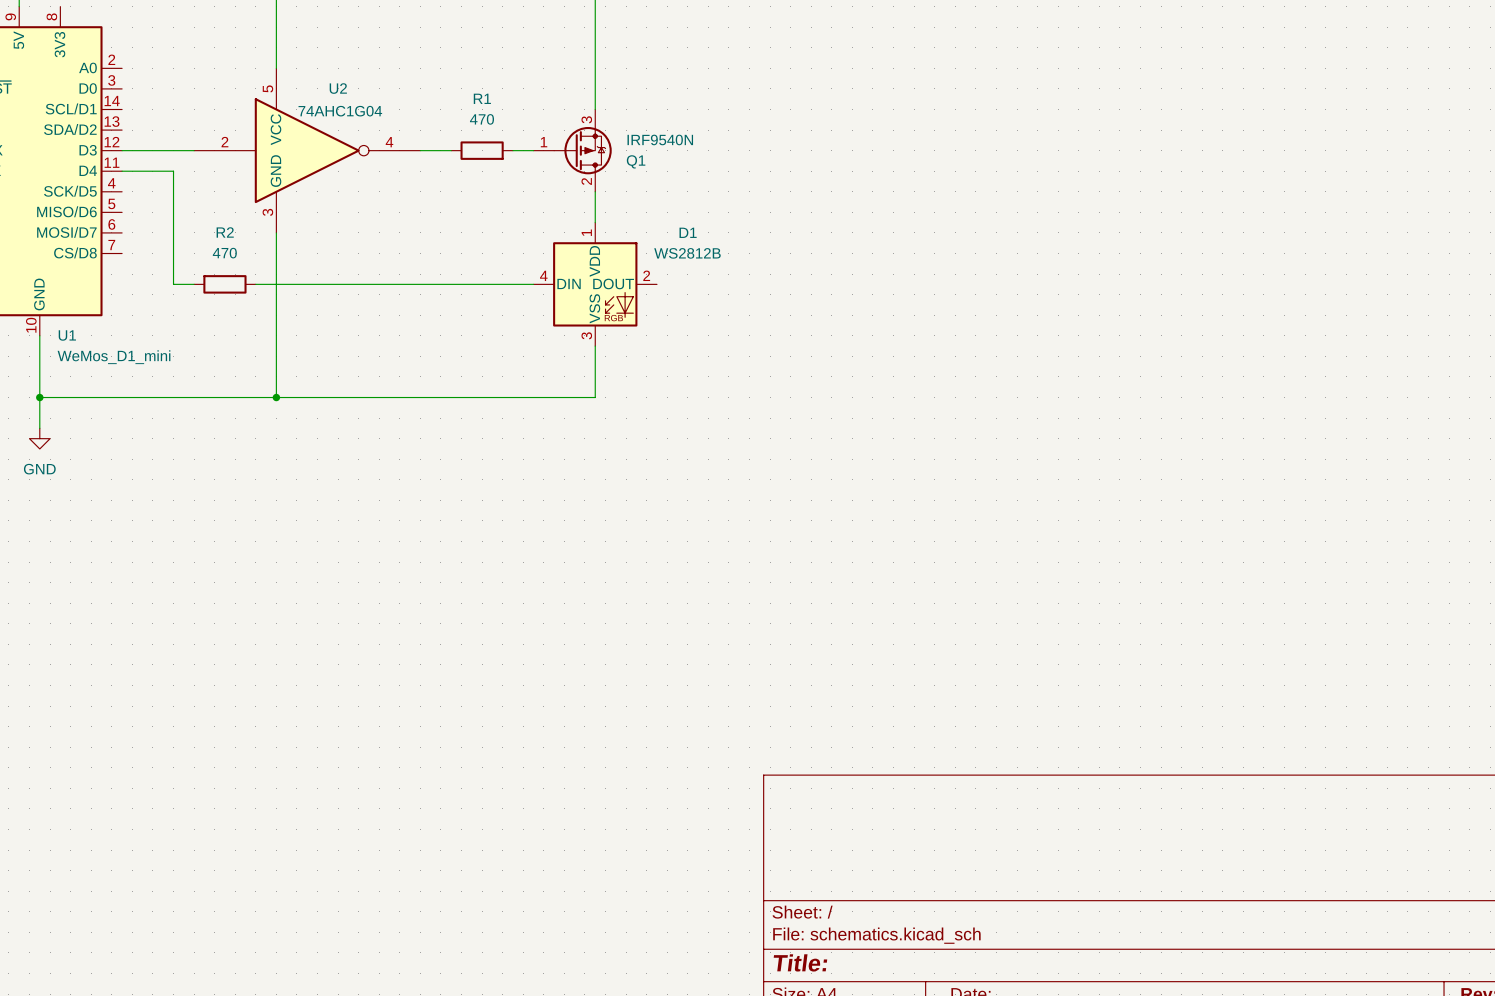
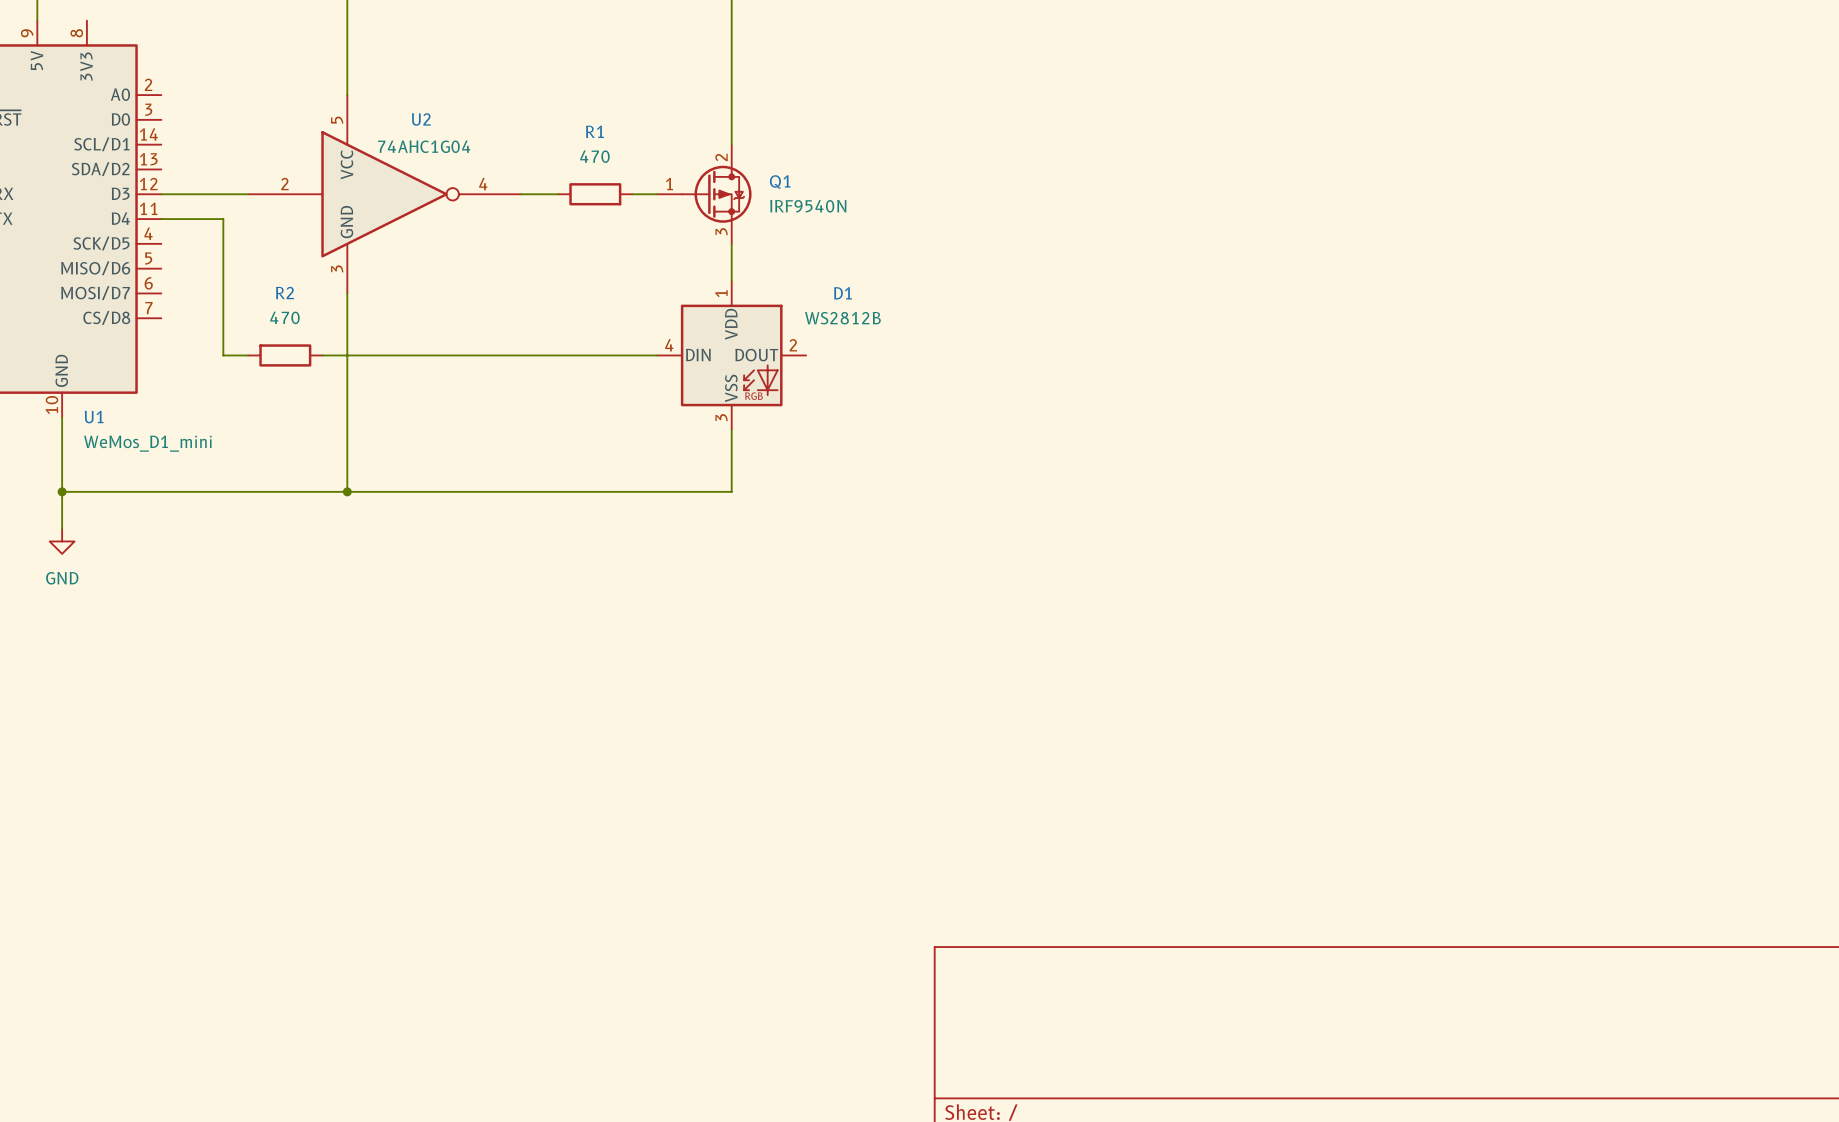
Q1 flip: as is (582, 150) -> up-down (716, 194)

